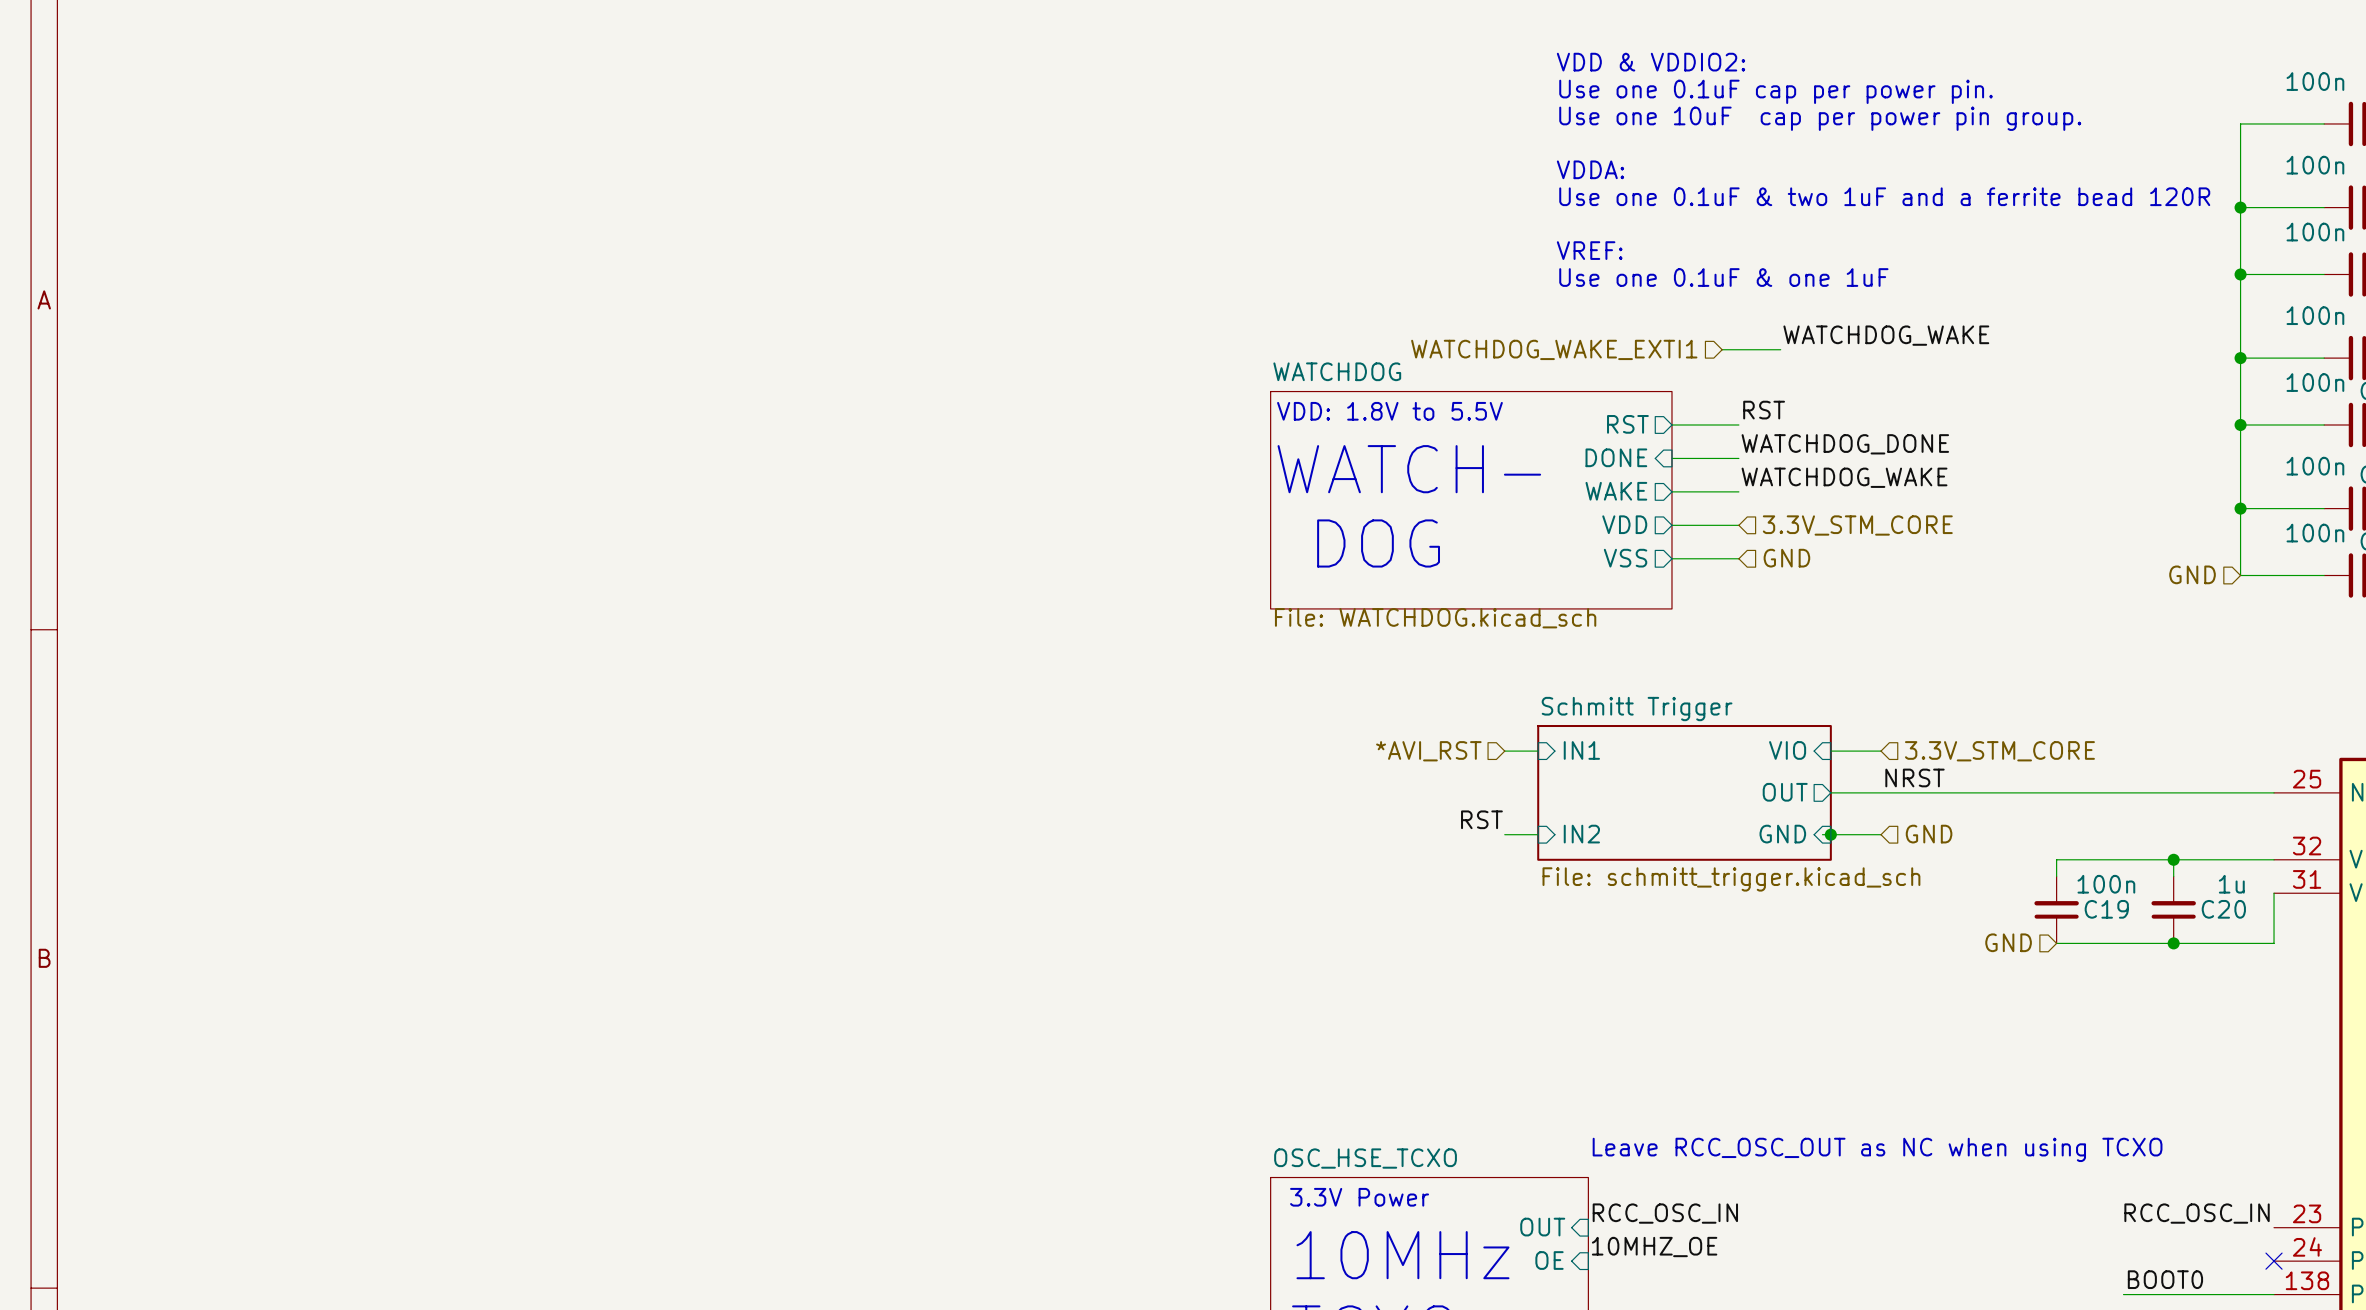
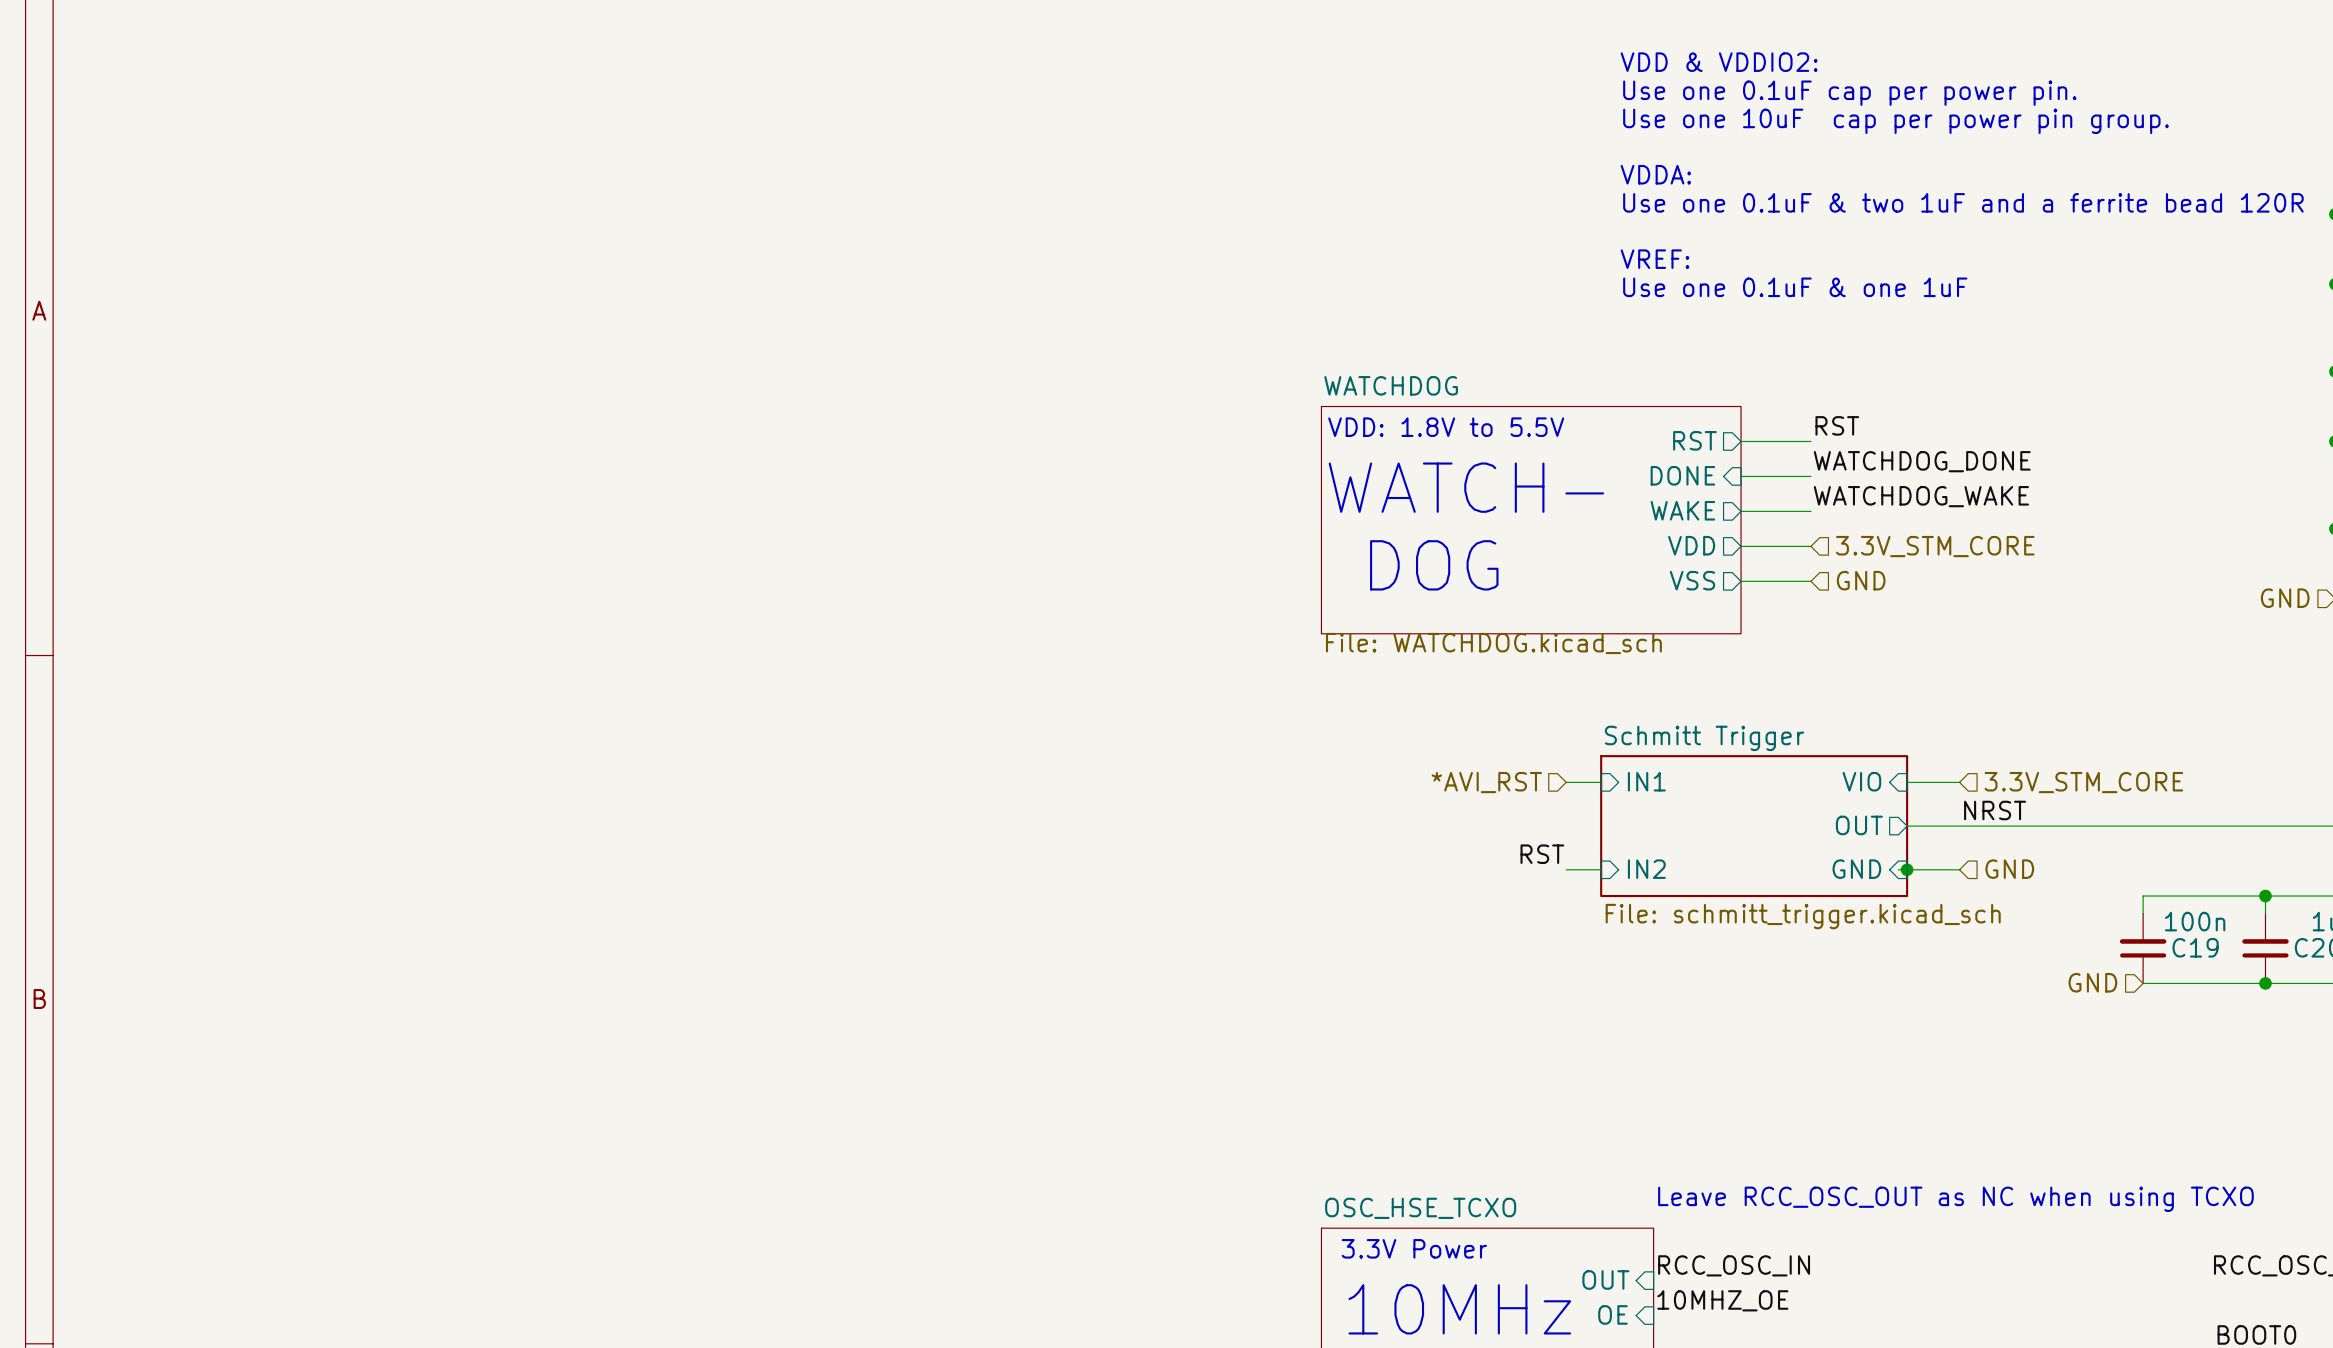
label: WATCHDOG_WAKE (1886, 335) -> none
hierarchical label: WATCHDOG_WAKE_EXTI1 (1554, 349) -> none
wire: (1722, 349) (1780, 349) -> none

